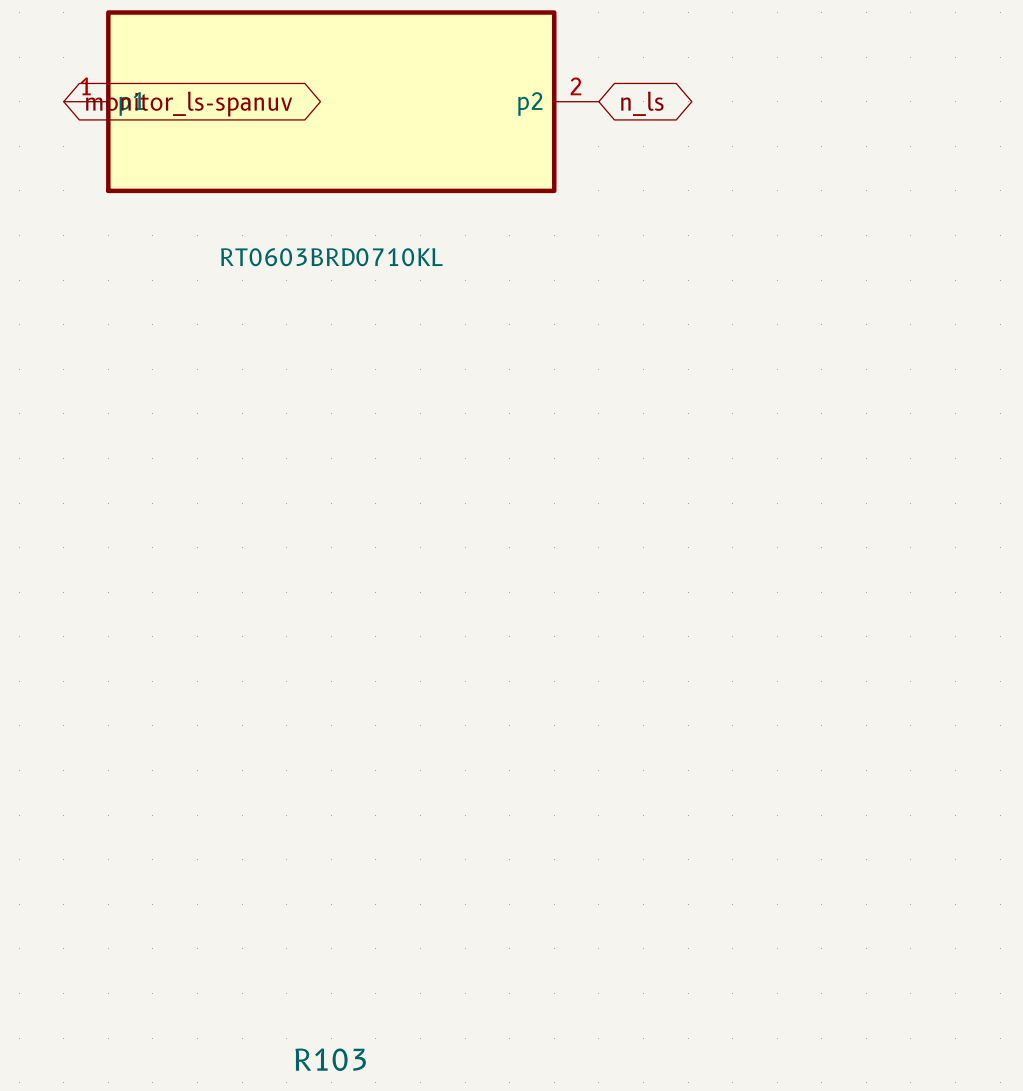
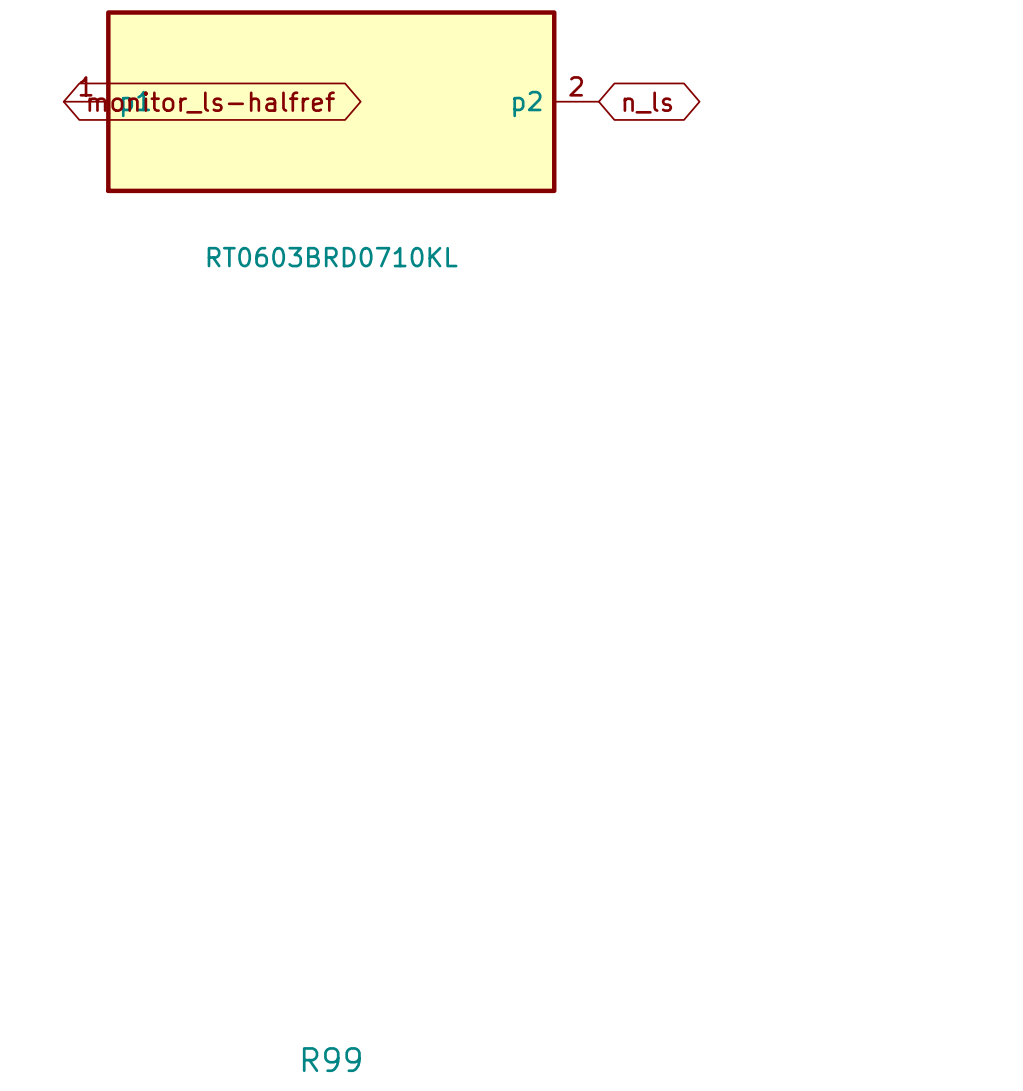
global label: monitor_ls-spanuv (189, 104) -> monitor_ls-halfref (211, 102)
R103 name: R103 (330, 1059) -> R99 (331, 1059)

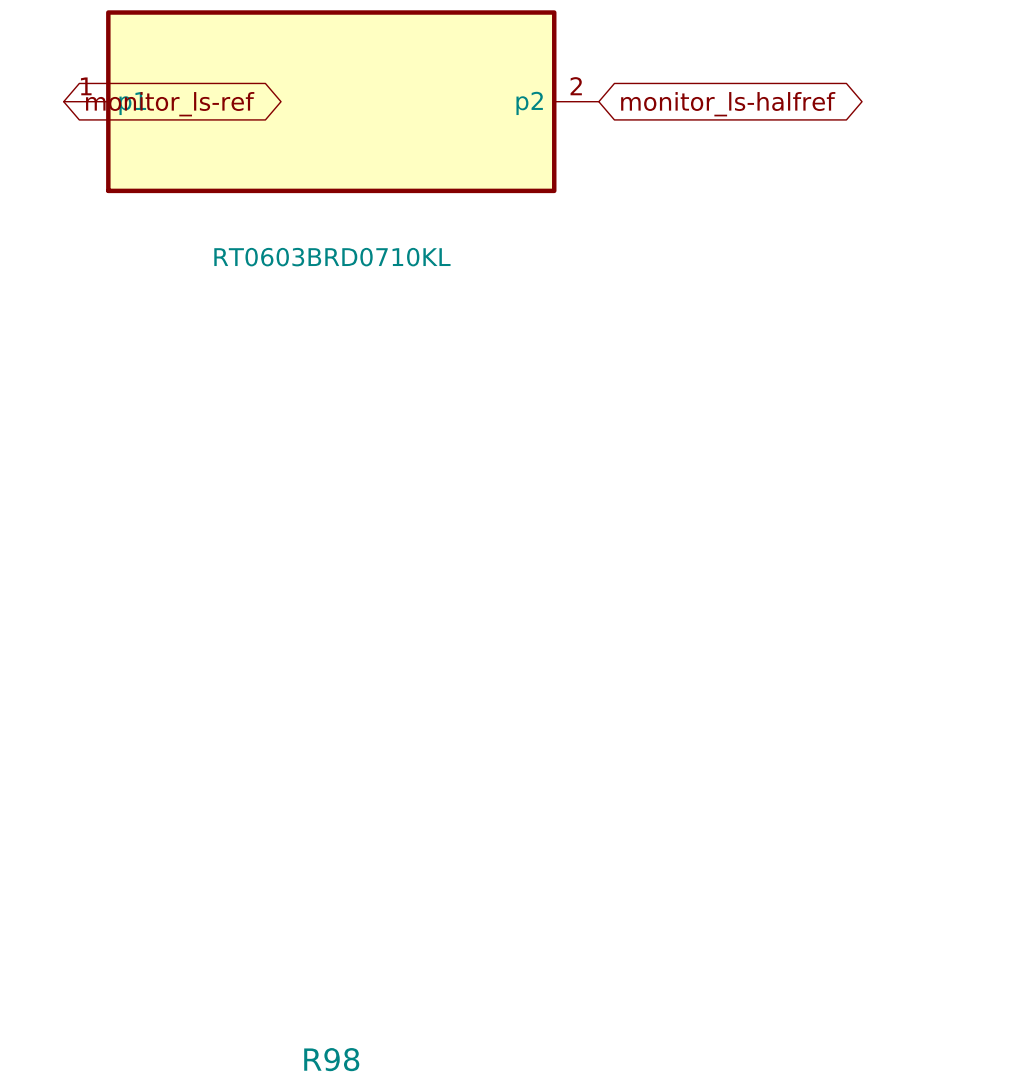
global label: monitor_ls-halfref (211, 102) -> monitor_ls-ref (170, 104)
global label: n_ls (647, 102) -> monitor_ls-halfref (728, 104)
R99 name: R99 (331, 1059) -> R98 (331, 1059)

